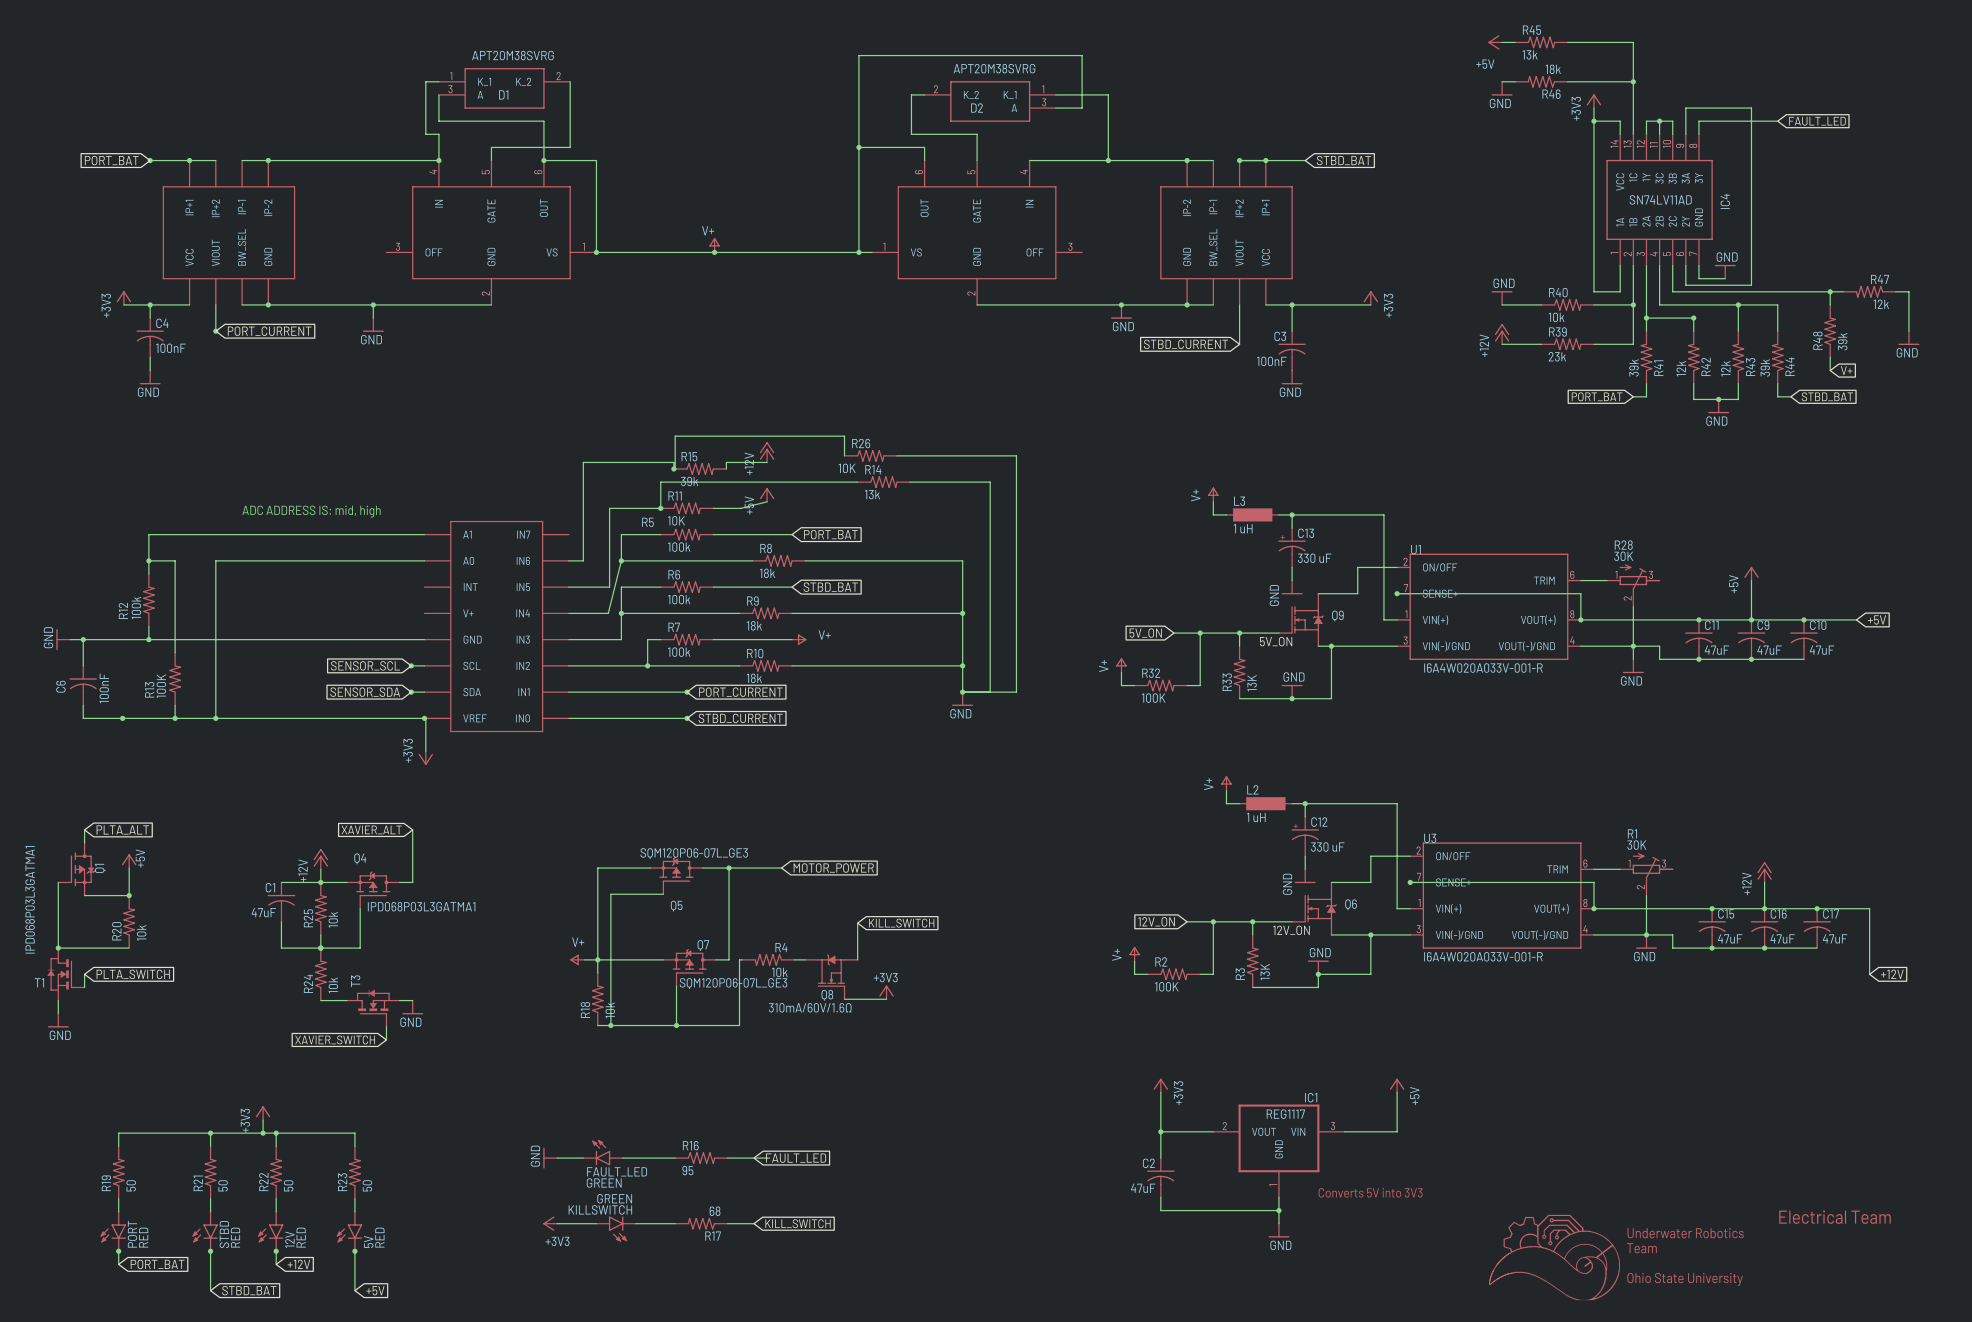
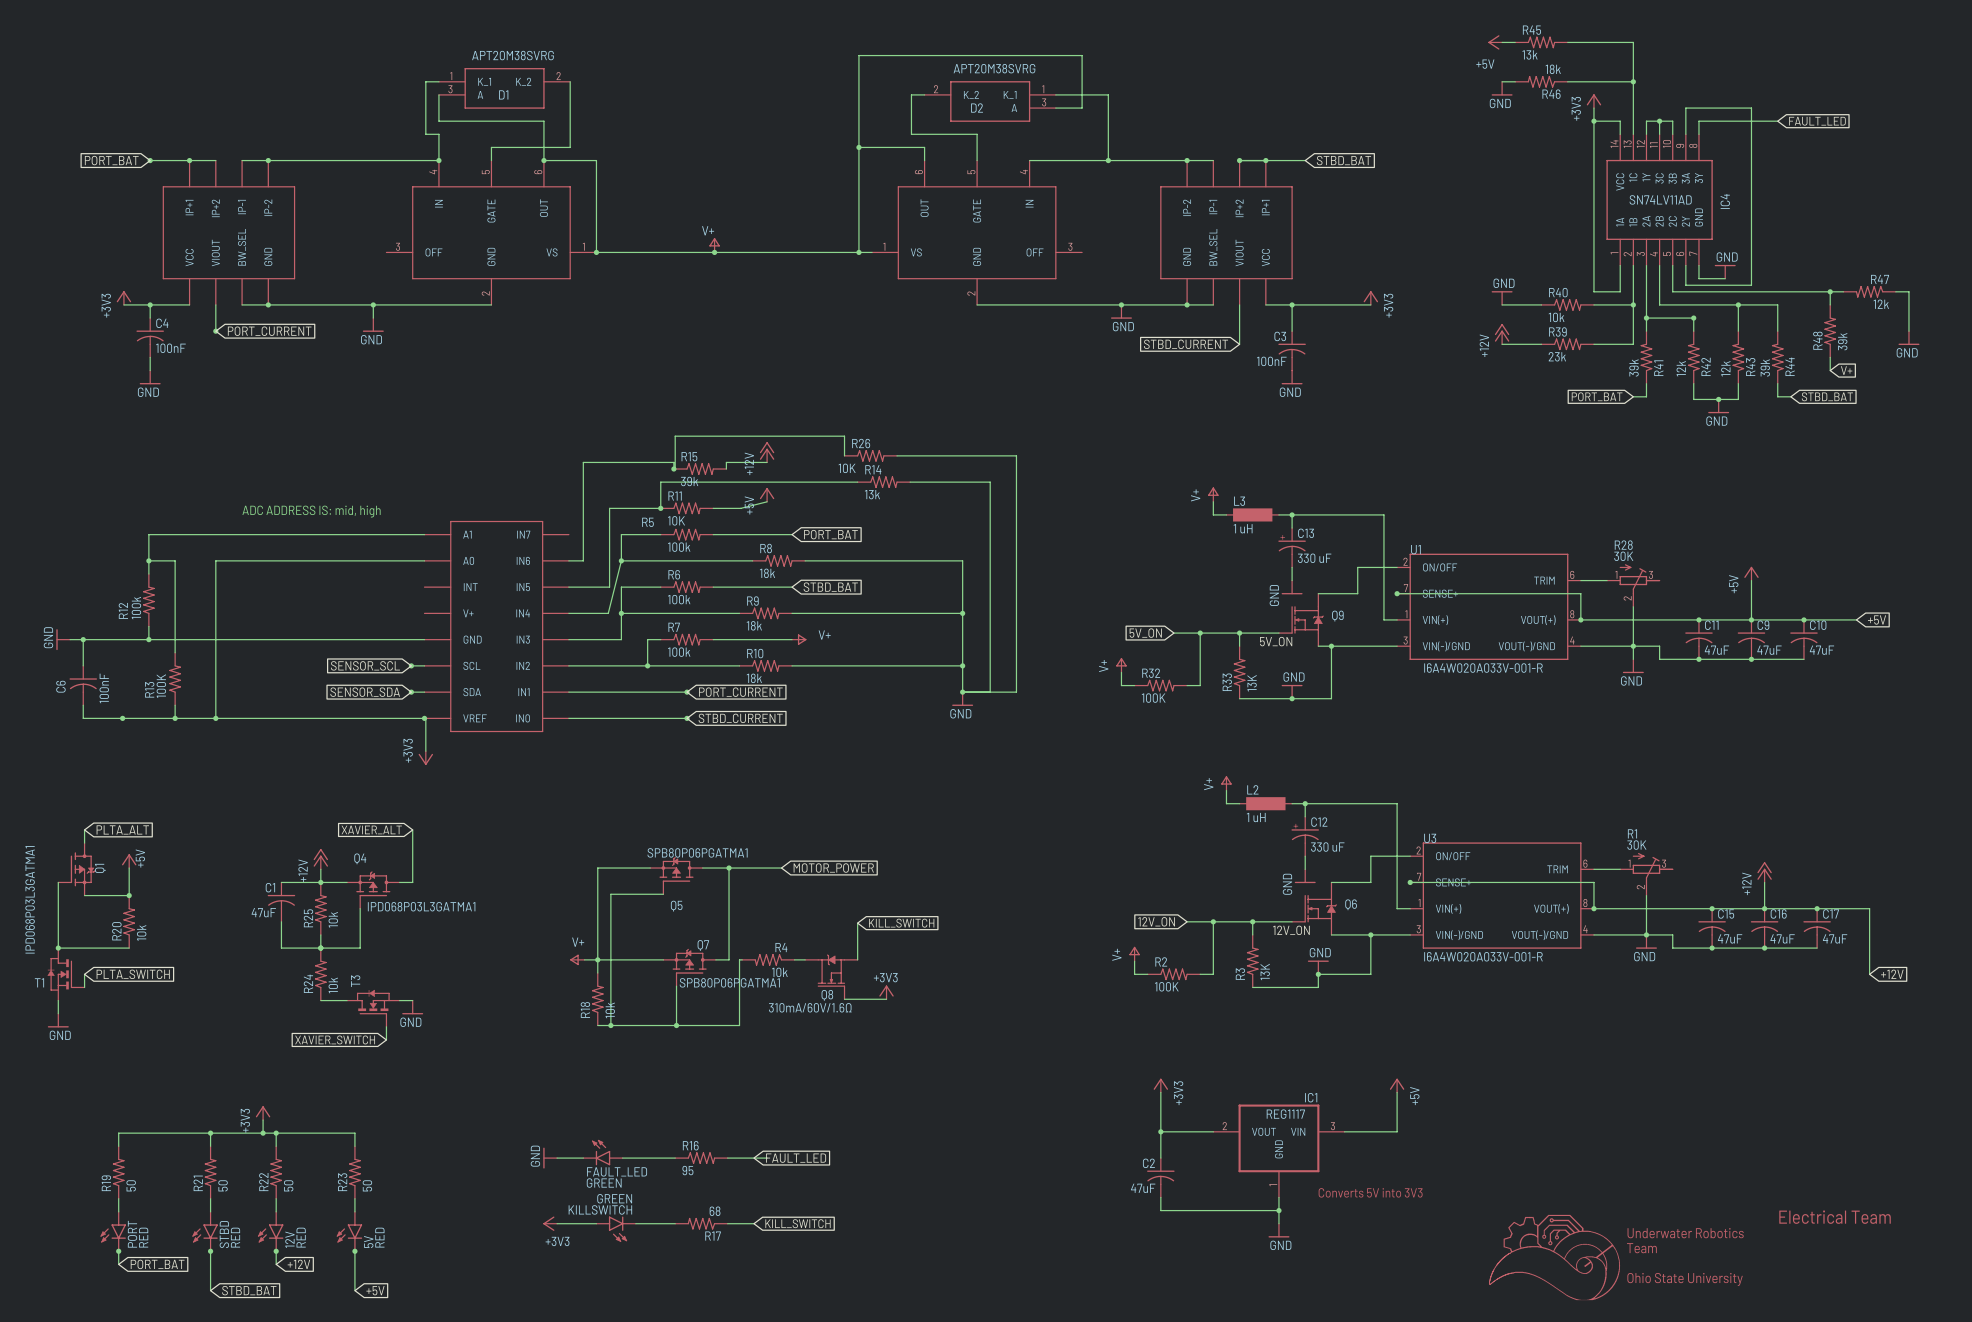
Q5 value: SQM120P06-07L_GE3 (694, 853) -> SPB80P06PGATMA1 (697, 852)
Q7 value: SQM120P06-07L_GE3 (733, 983) -> SPB80P06PGATMA1 (729, 982)

